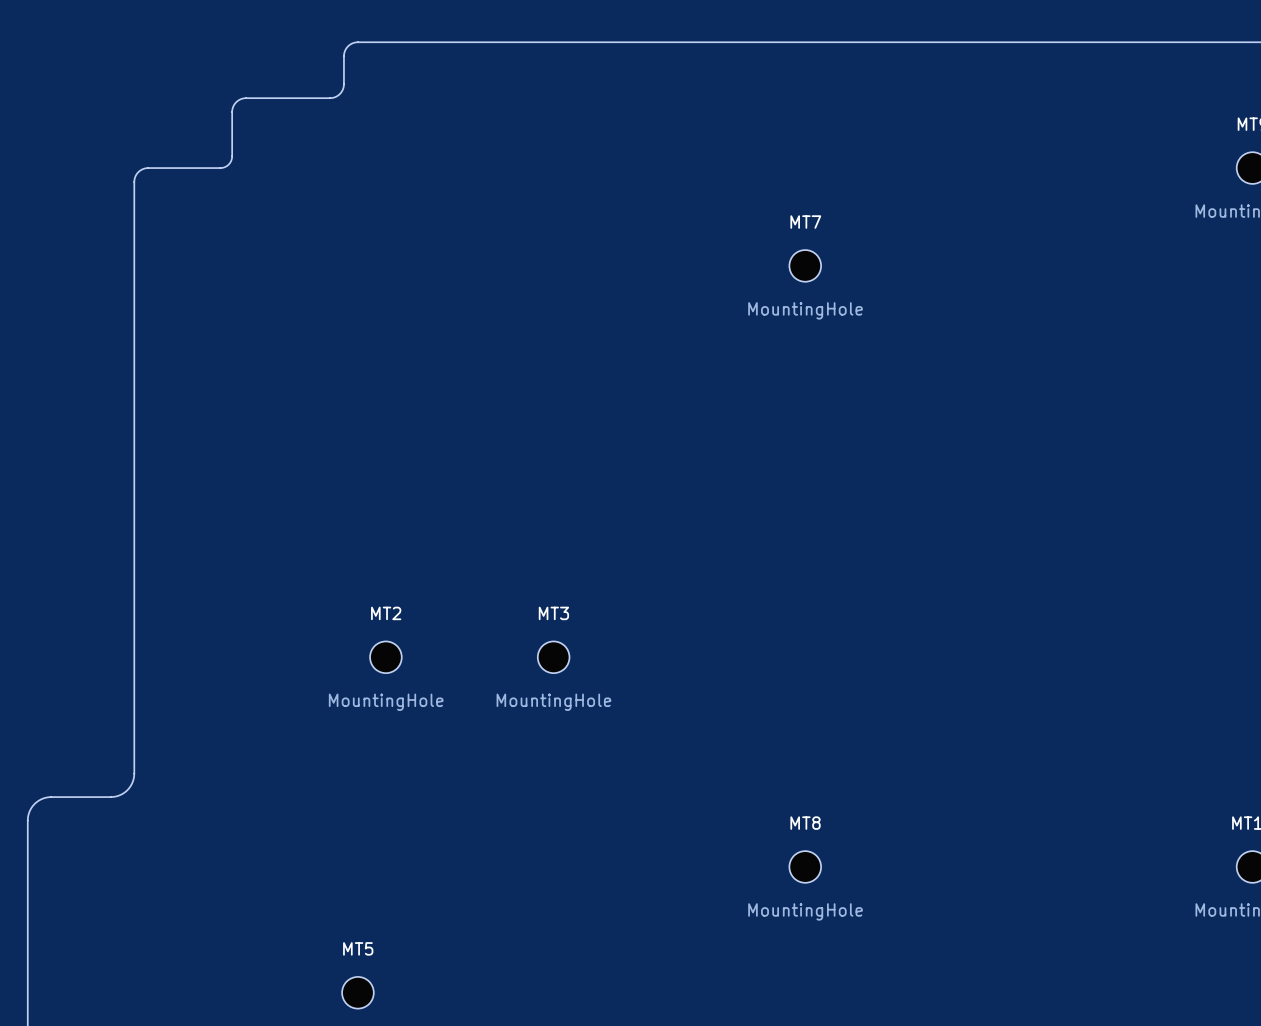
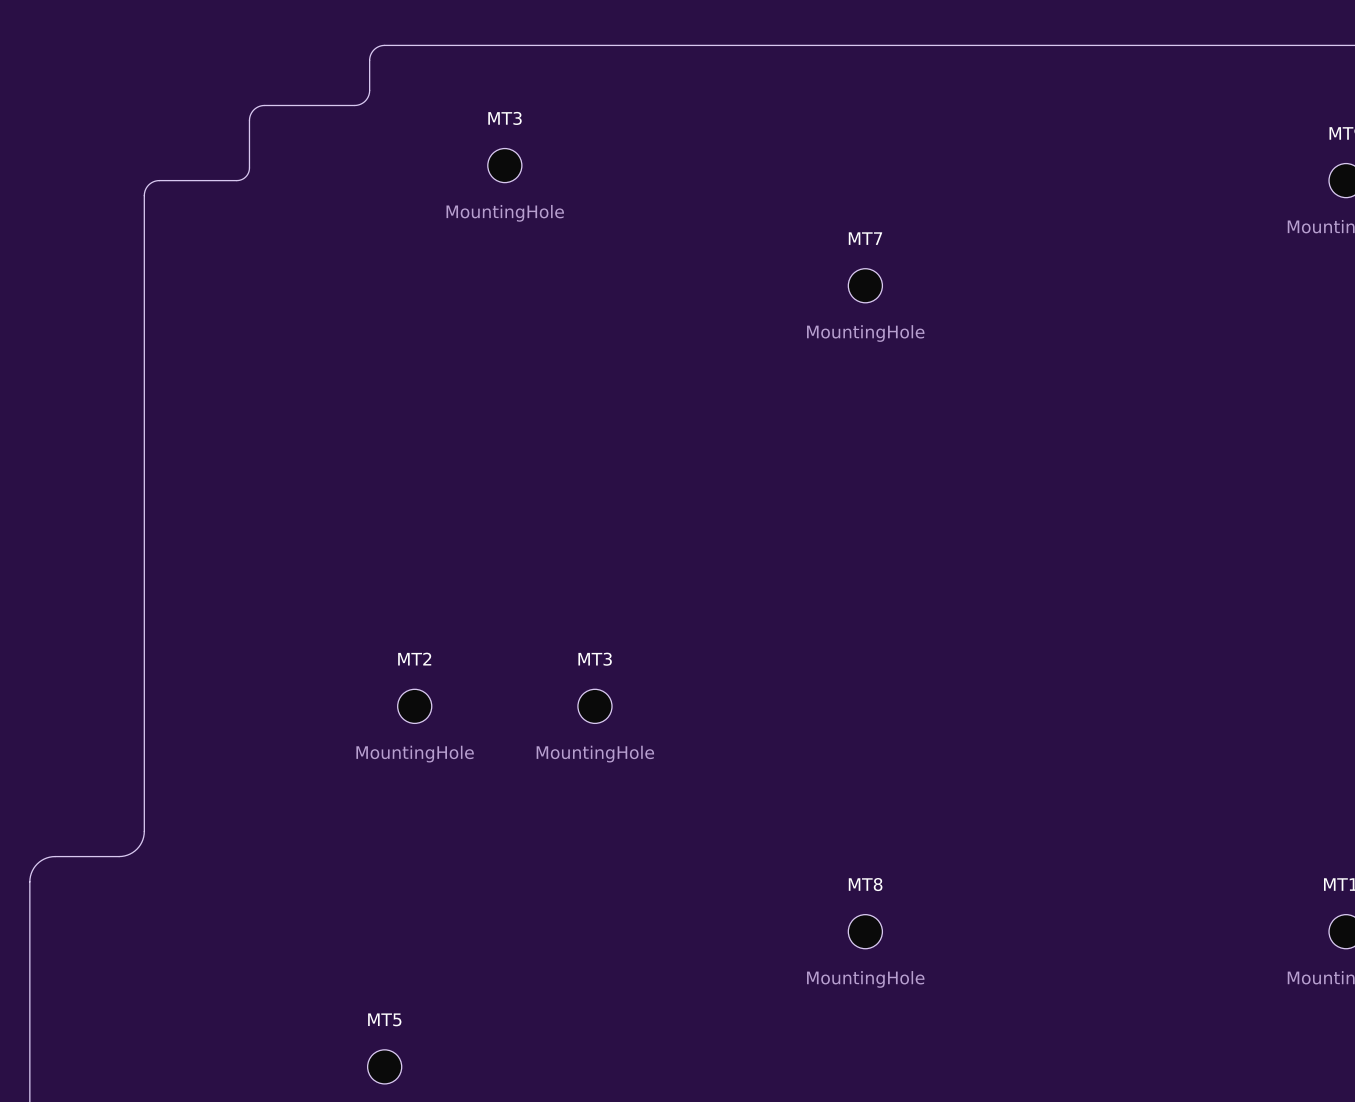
MT3: none -> MountingHole (504, 165)

